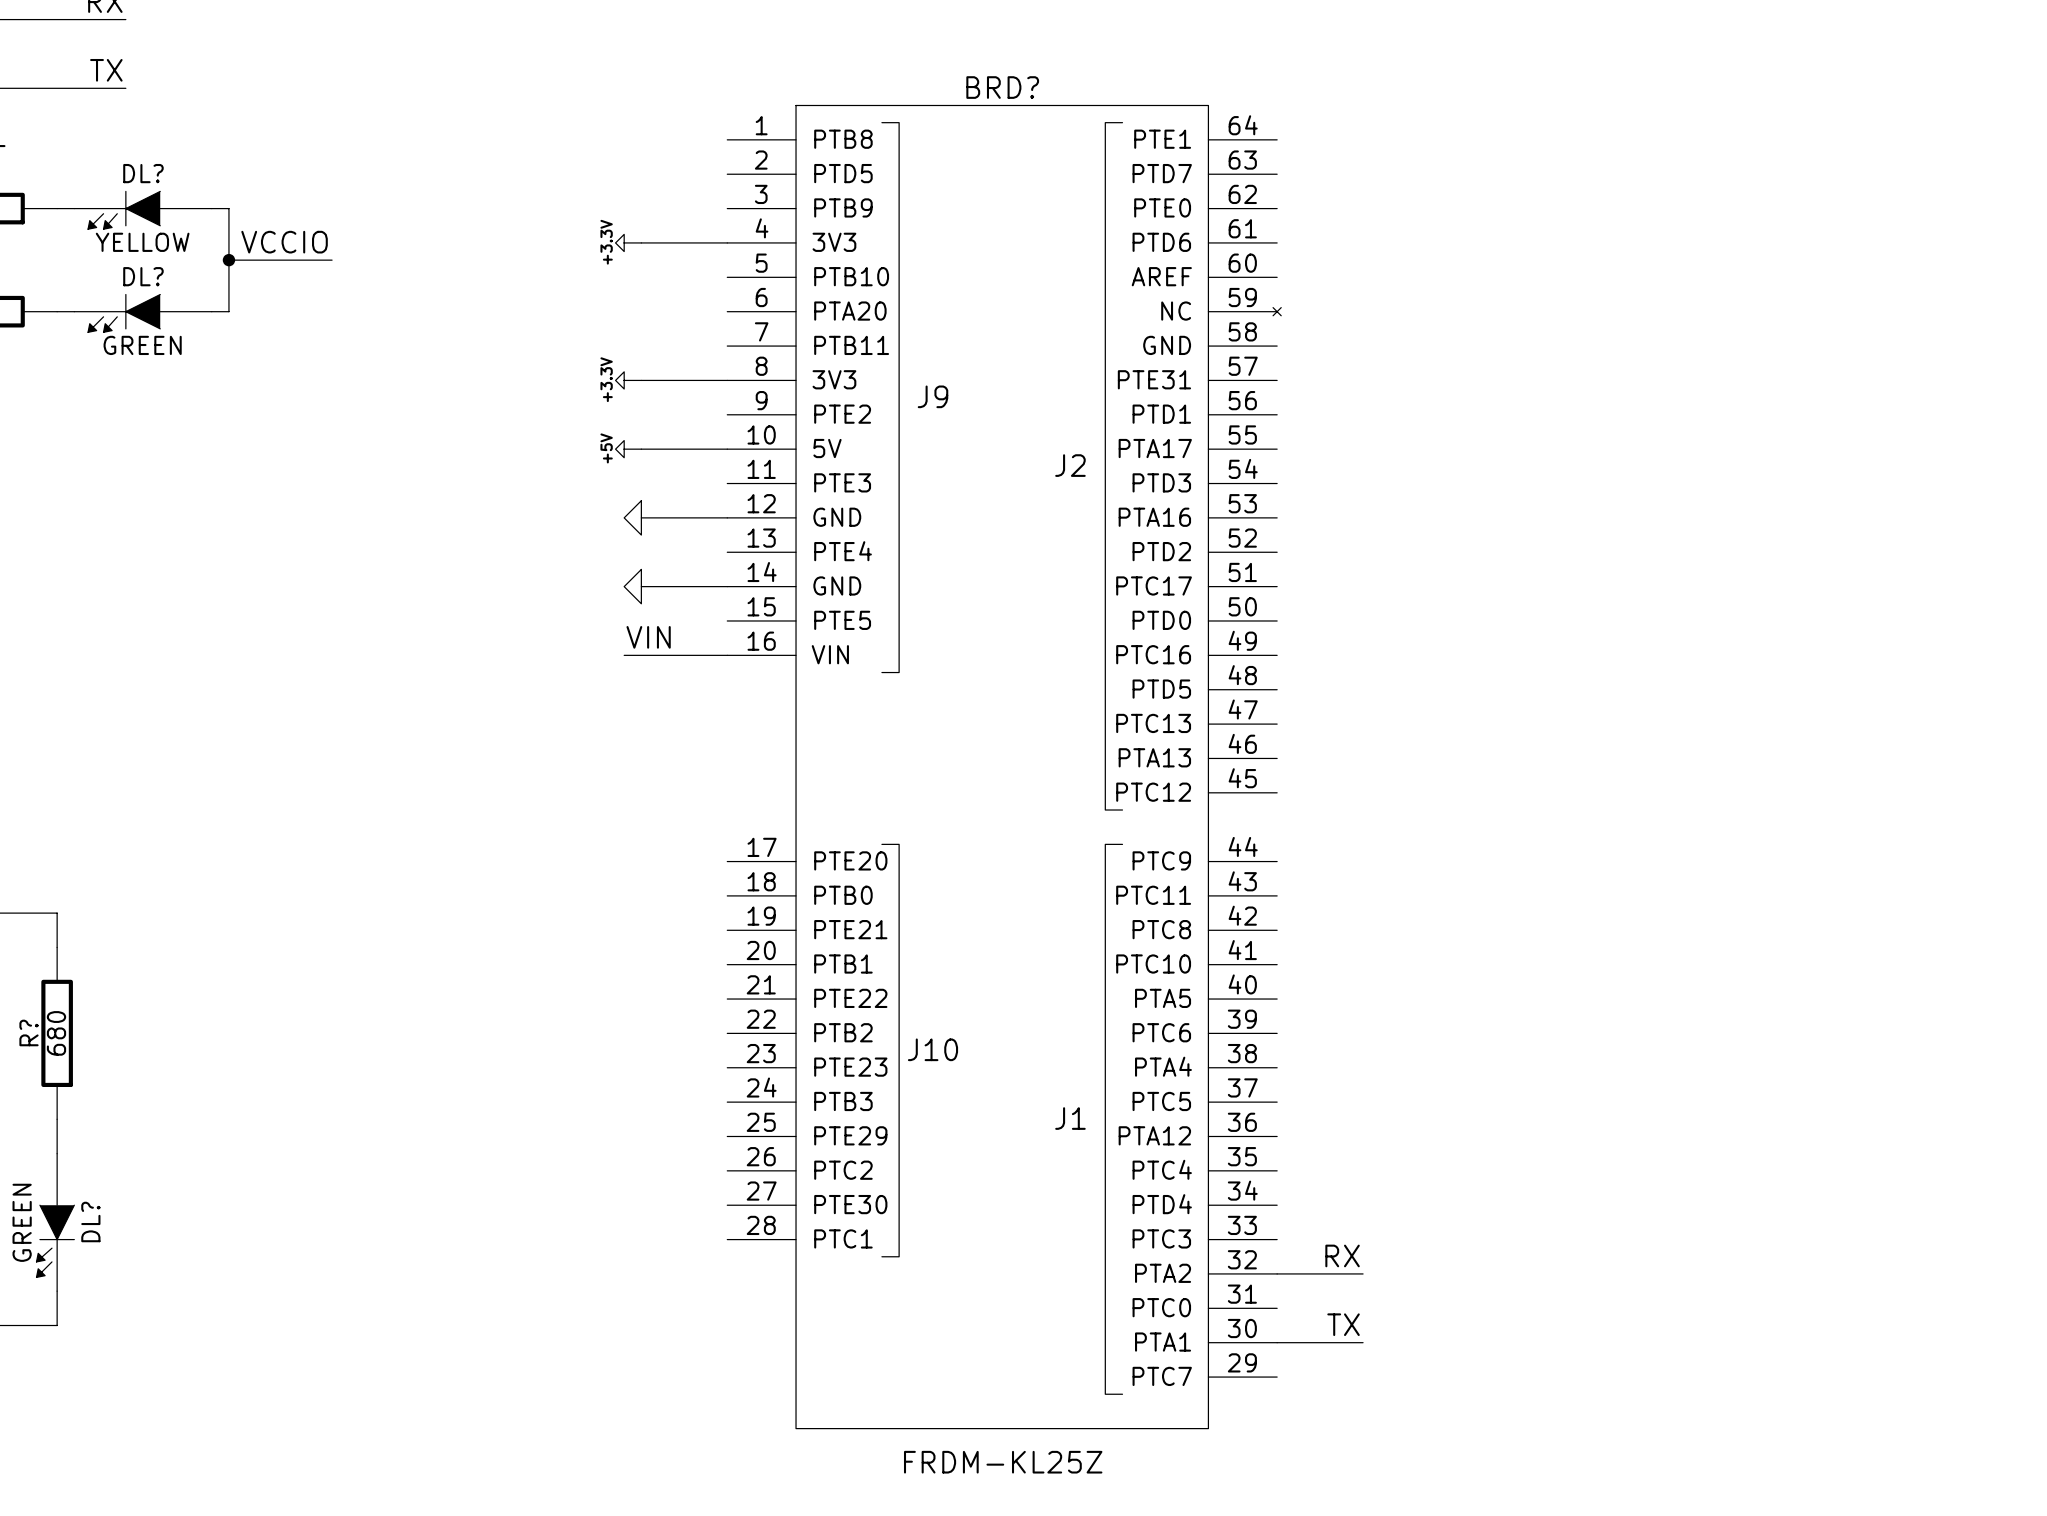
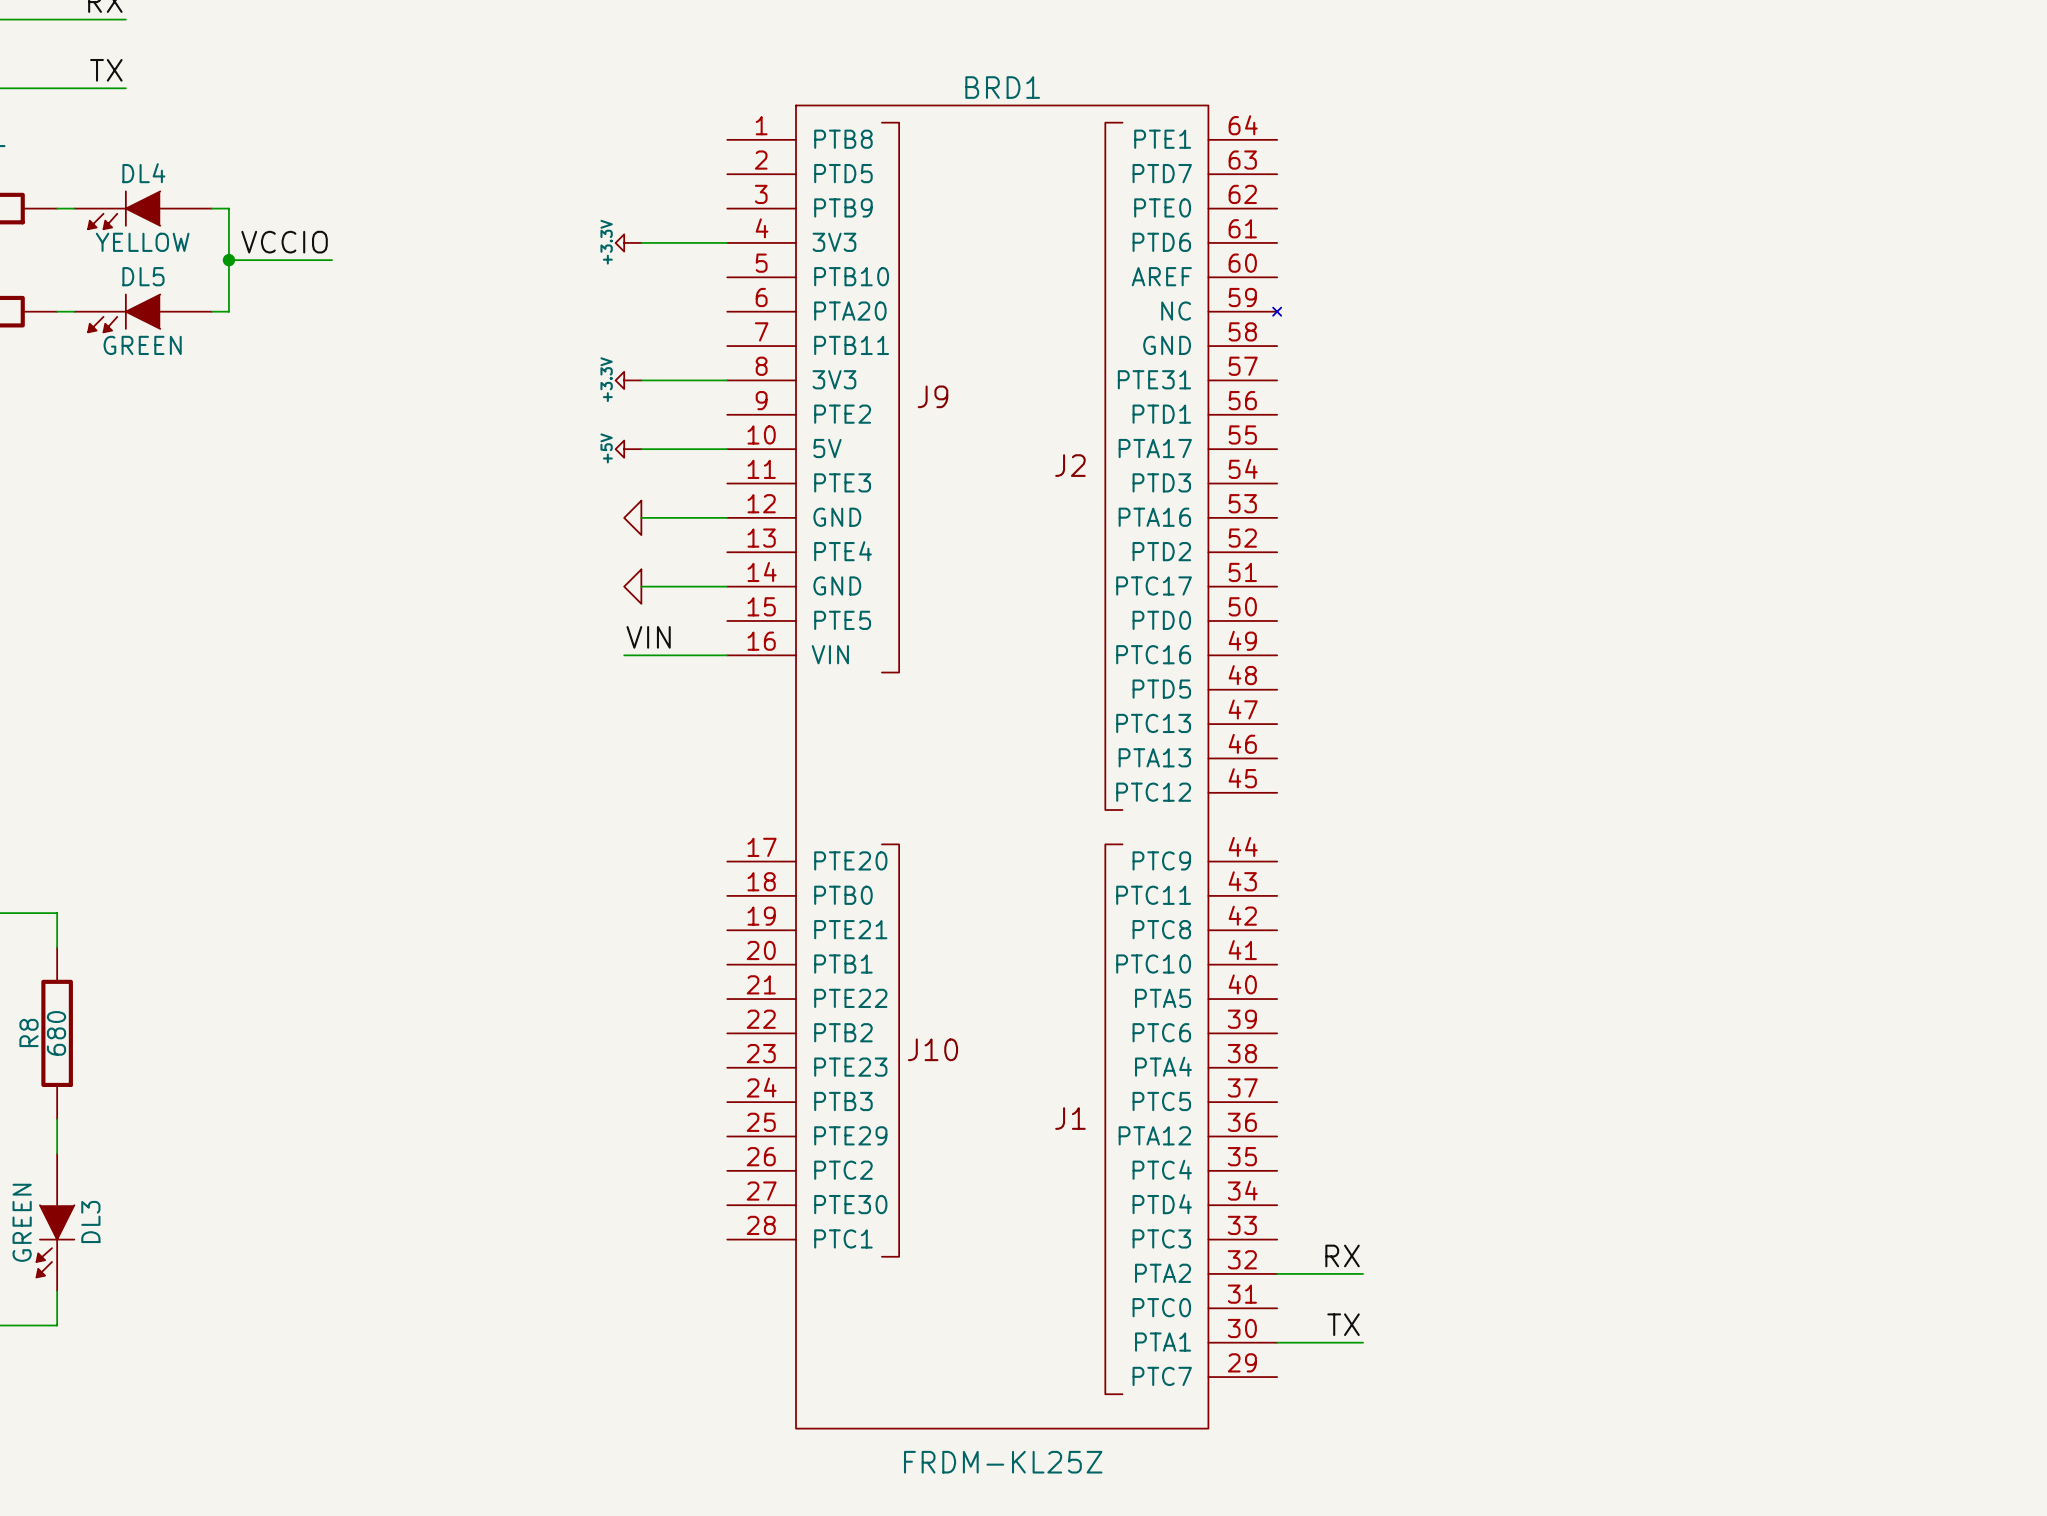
BRD? name: BRD? (1002, 87) -> BRD1 (1002, 87)
DL? name: DL? (143, 173) -> DL4 (143, 173)
DL? name: DL? (143, 276) -> DL5 (143, 276)
R? name: R? (29, 1032) -> R8 (29, 1032)
DL? name: DL? (90, 1221) -> DL3 (90, 1221)

